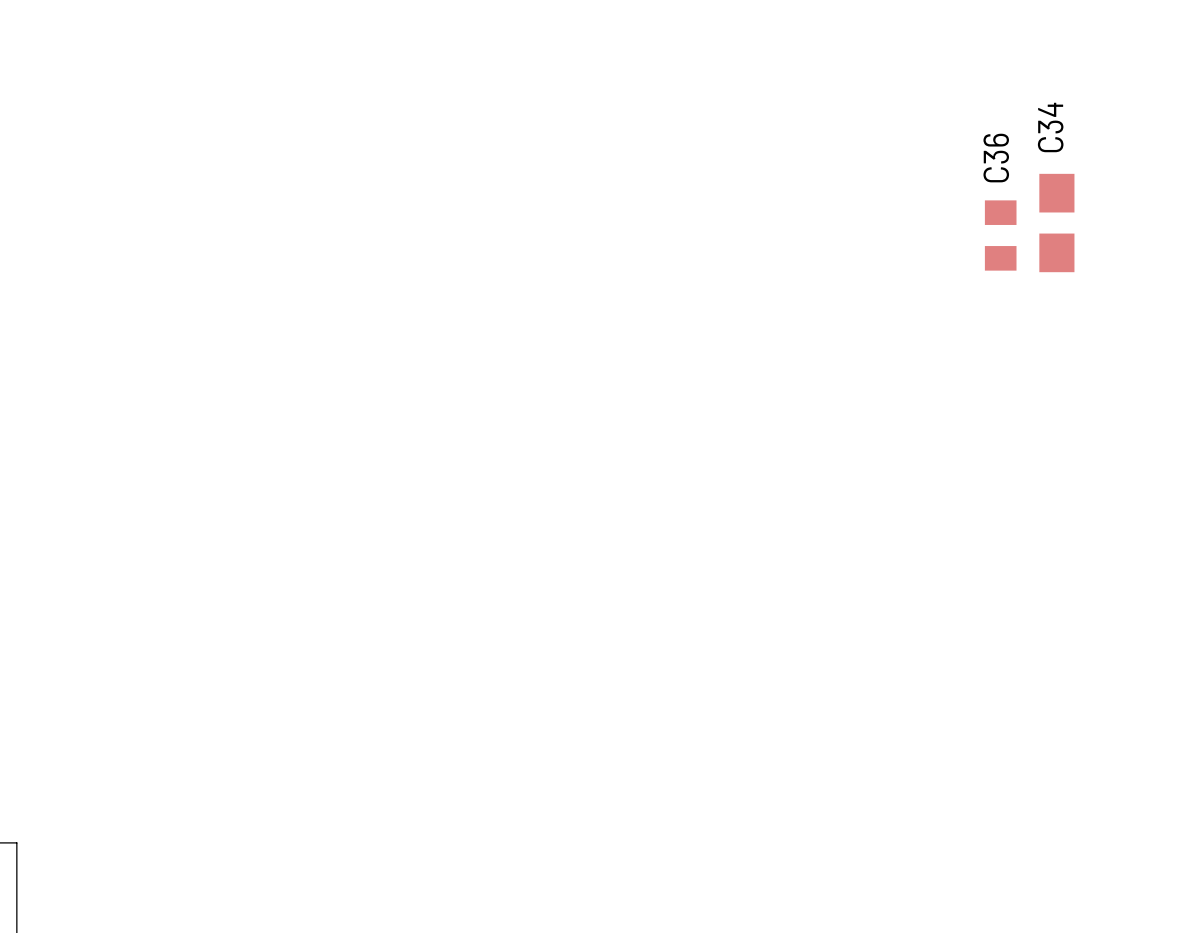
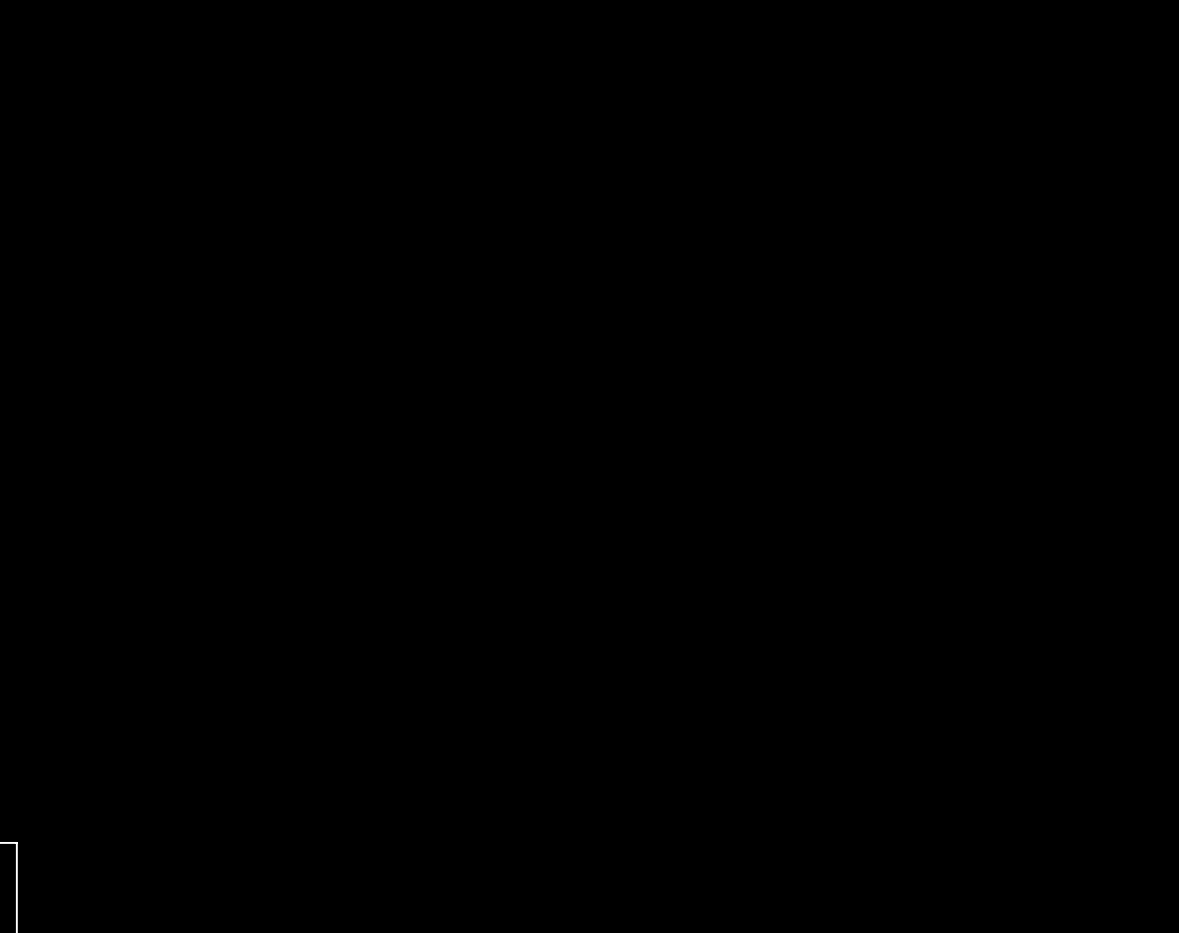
C34: (1056, 223) -> none
C36: (1000, 235) -> none

